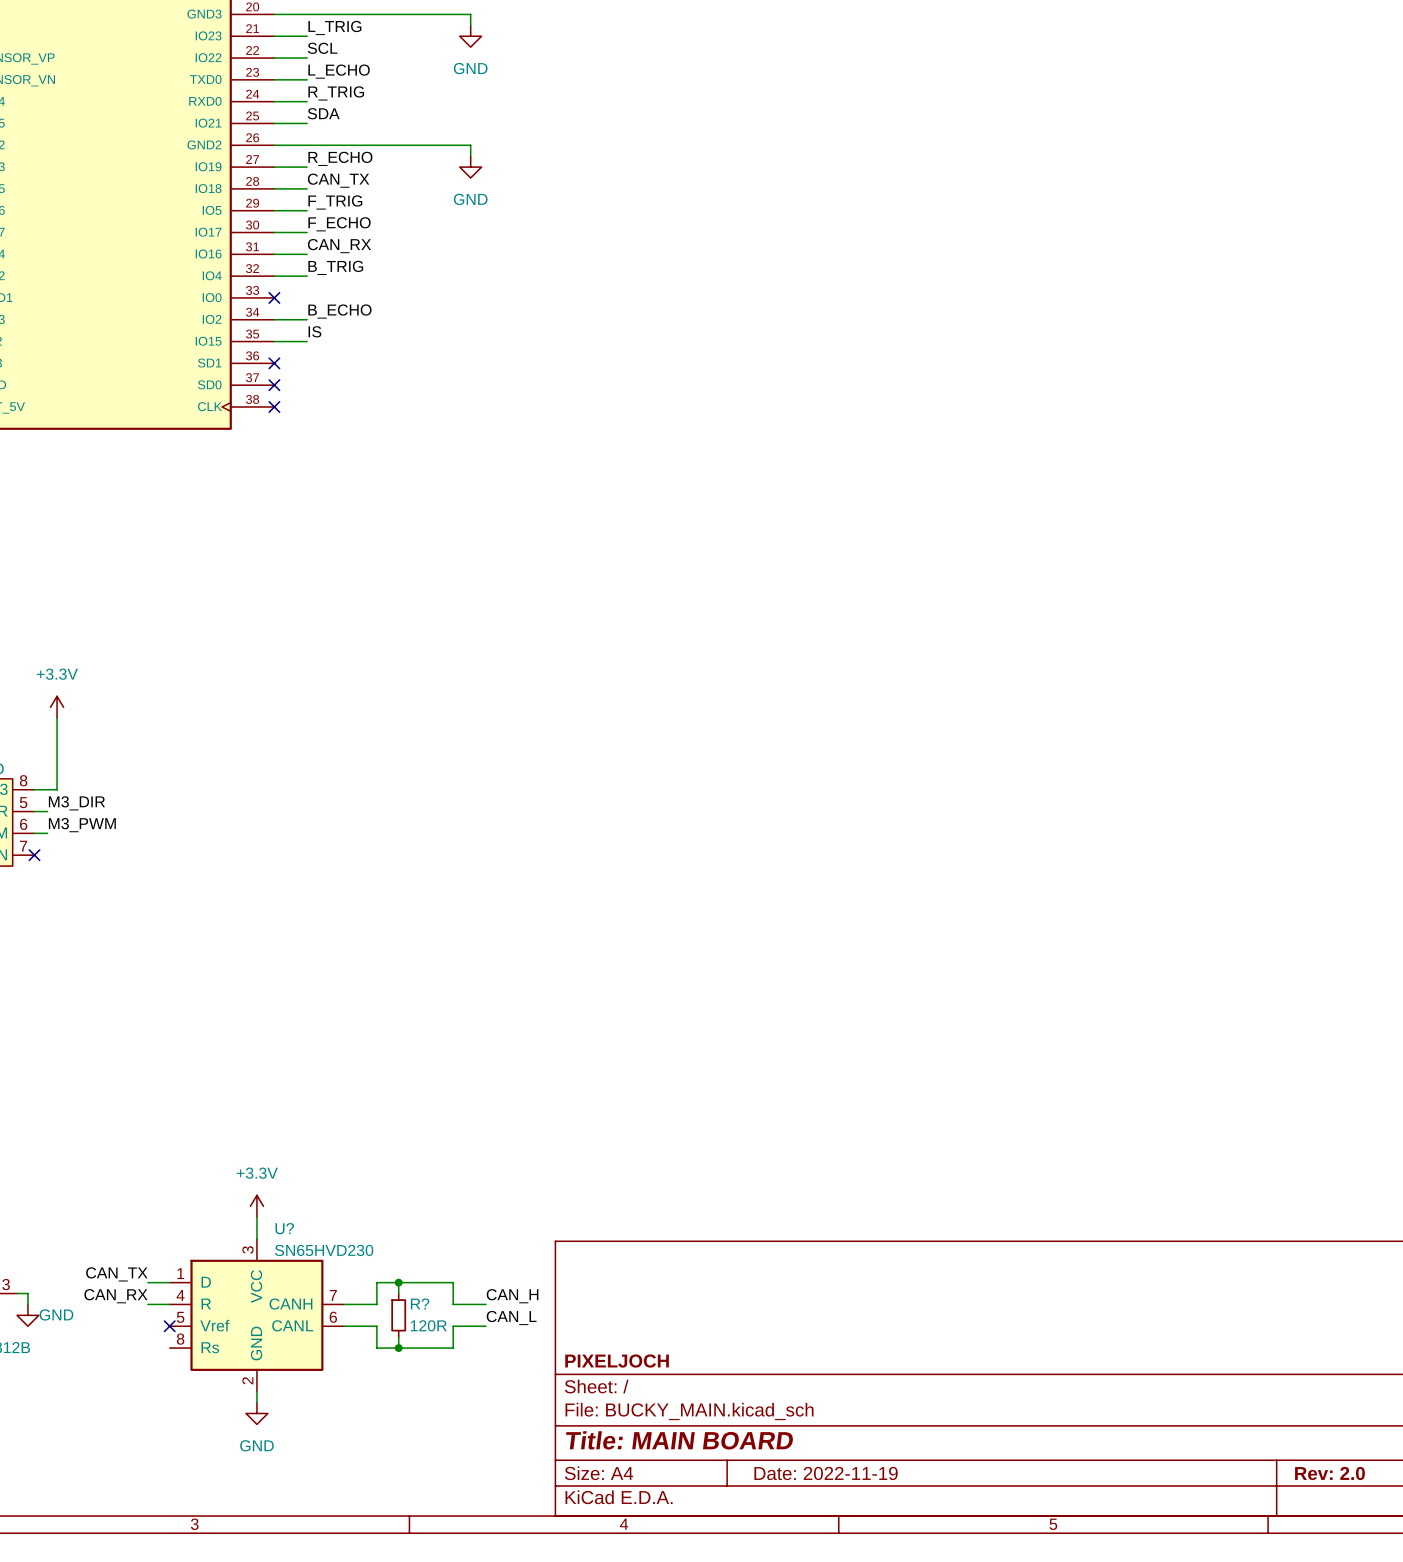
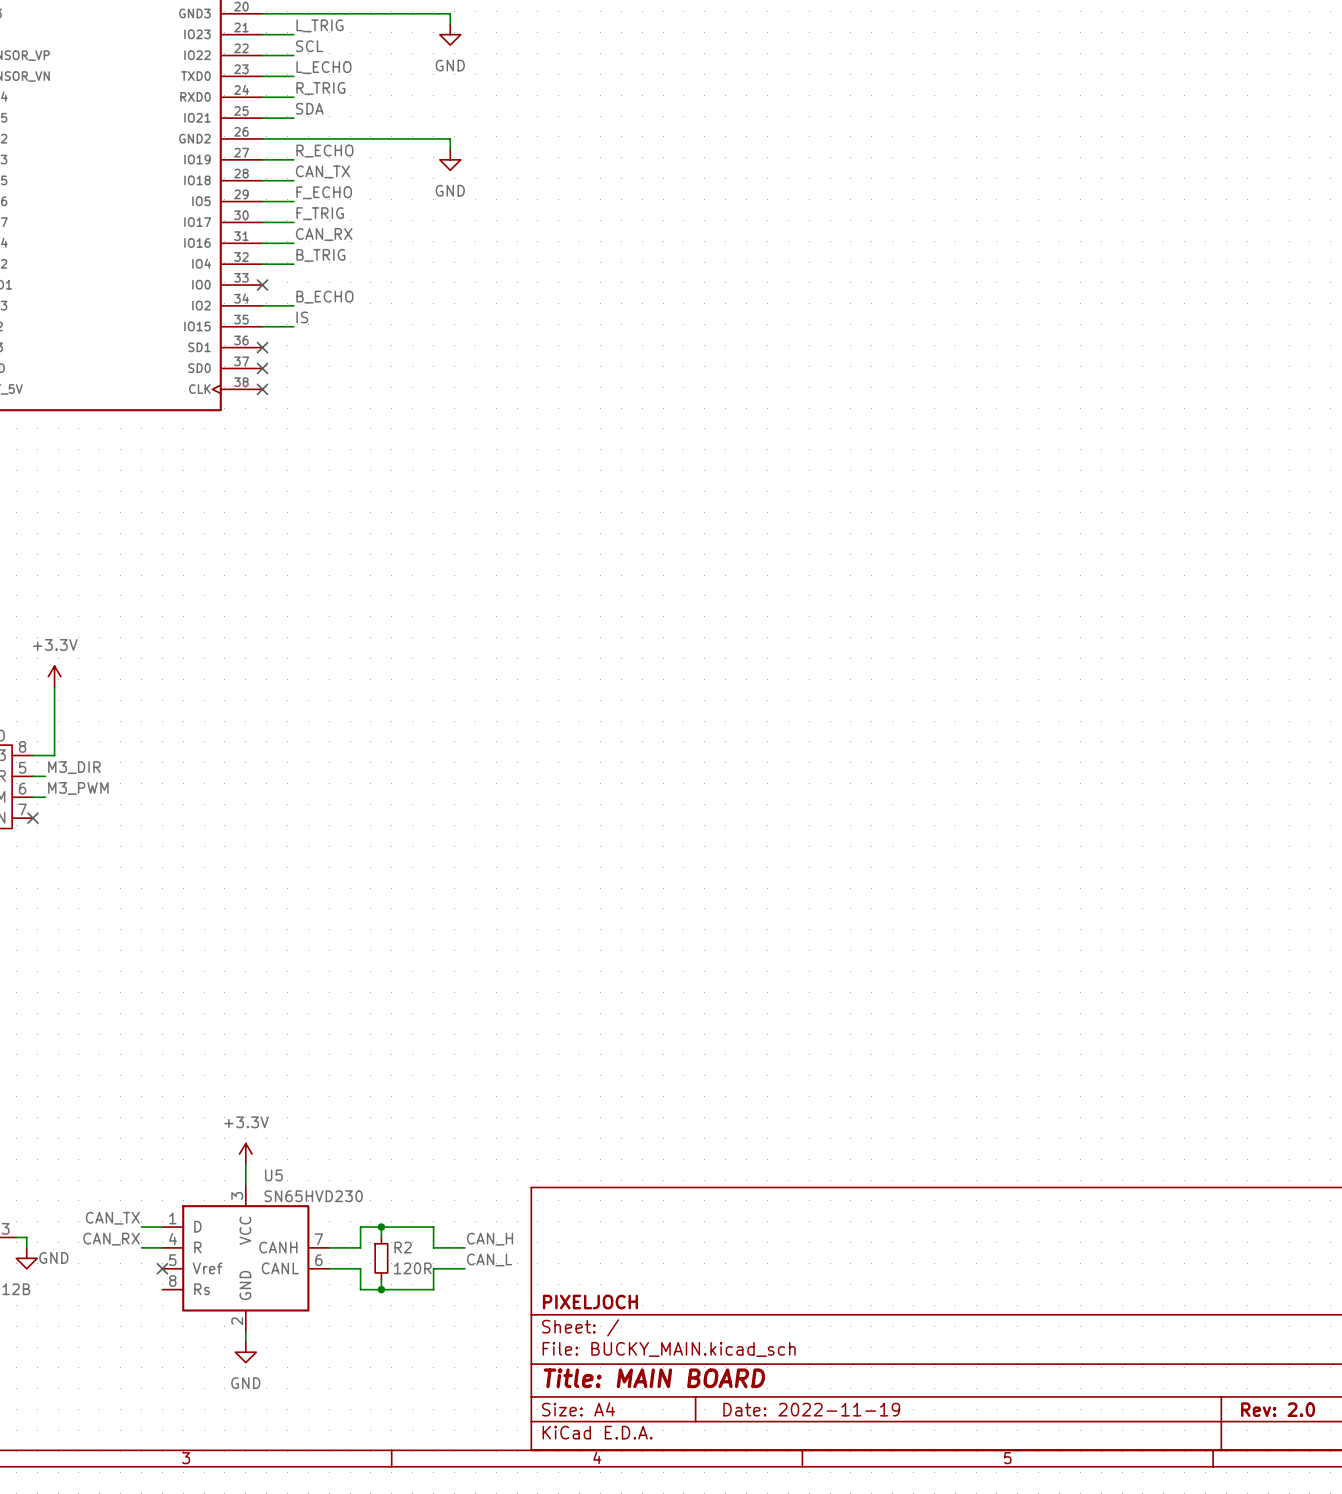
label: F_TRIG (335, 202) -> F_ECHO (324, 192)
label: F_ECHO (339, 224) -> F_TRIG (320, 213)
U? name: U? (284, 1228) -> U5 (273, 1175)
R? name: R? (420, 1303) -> R2 (403, 1247)

